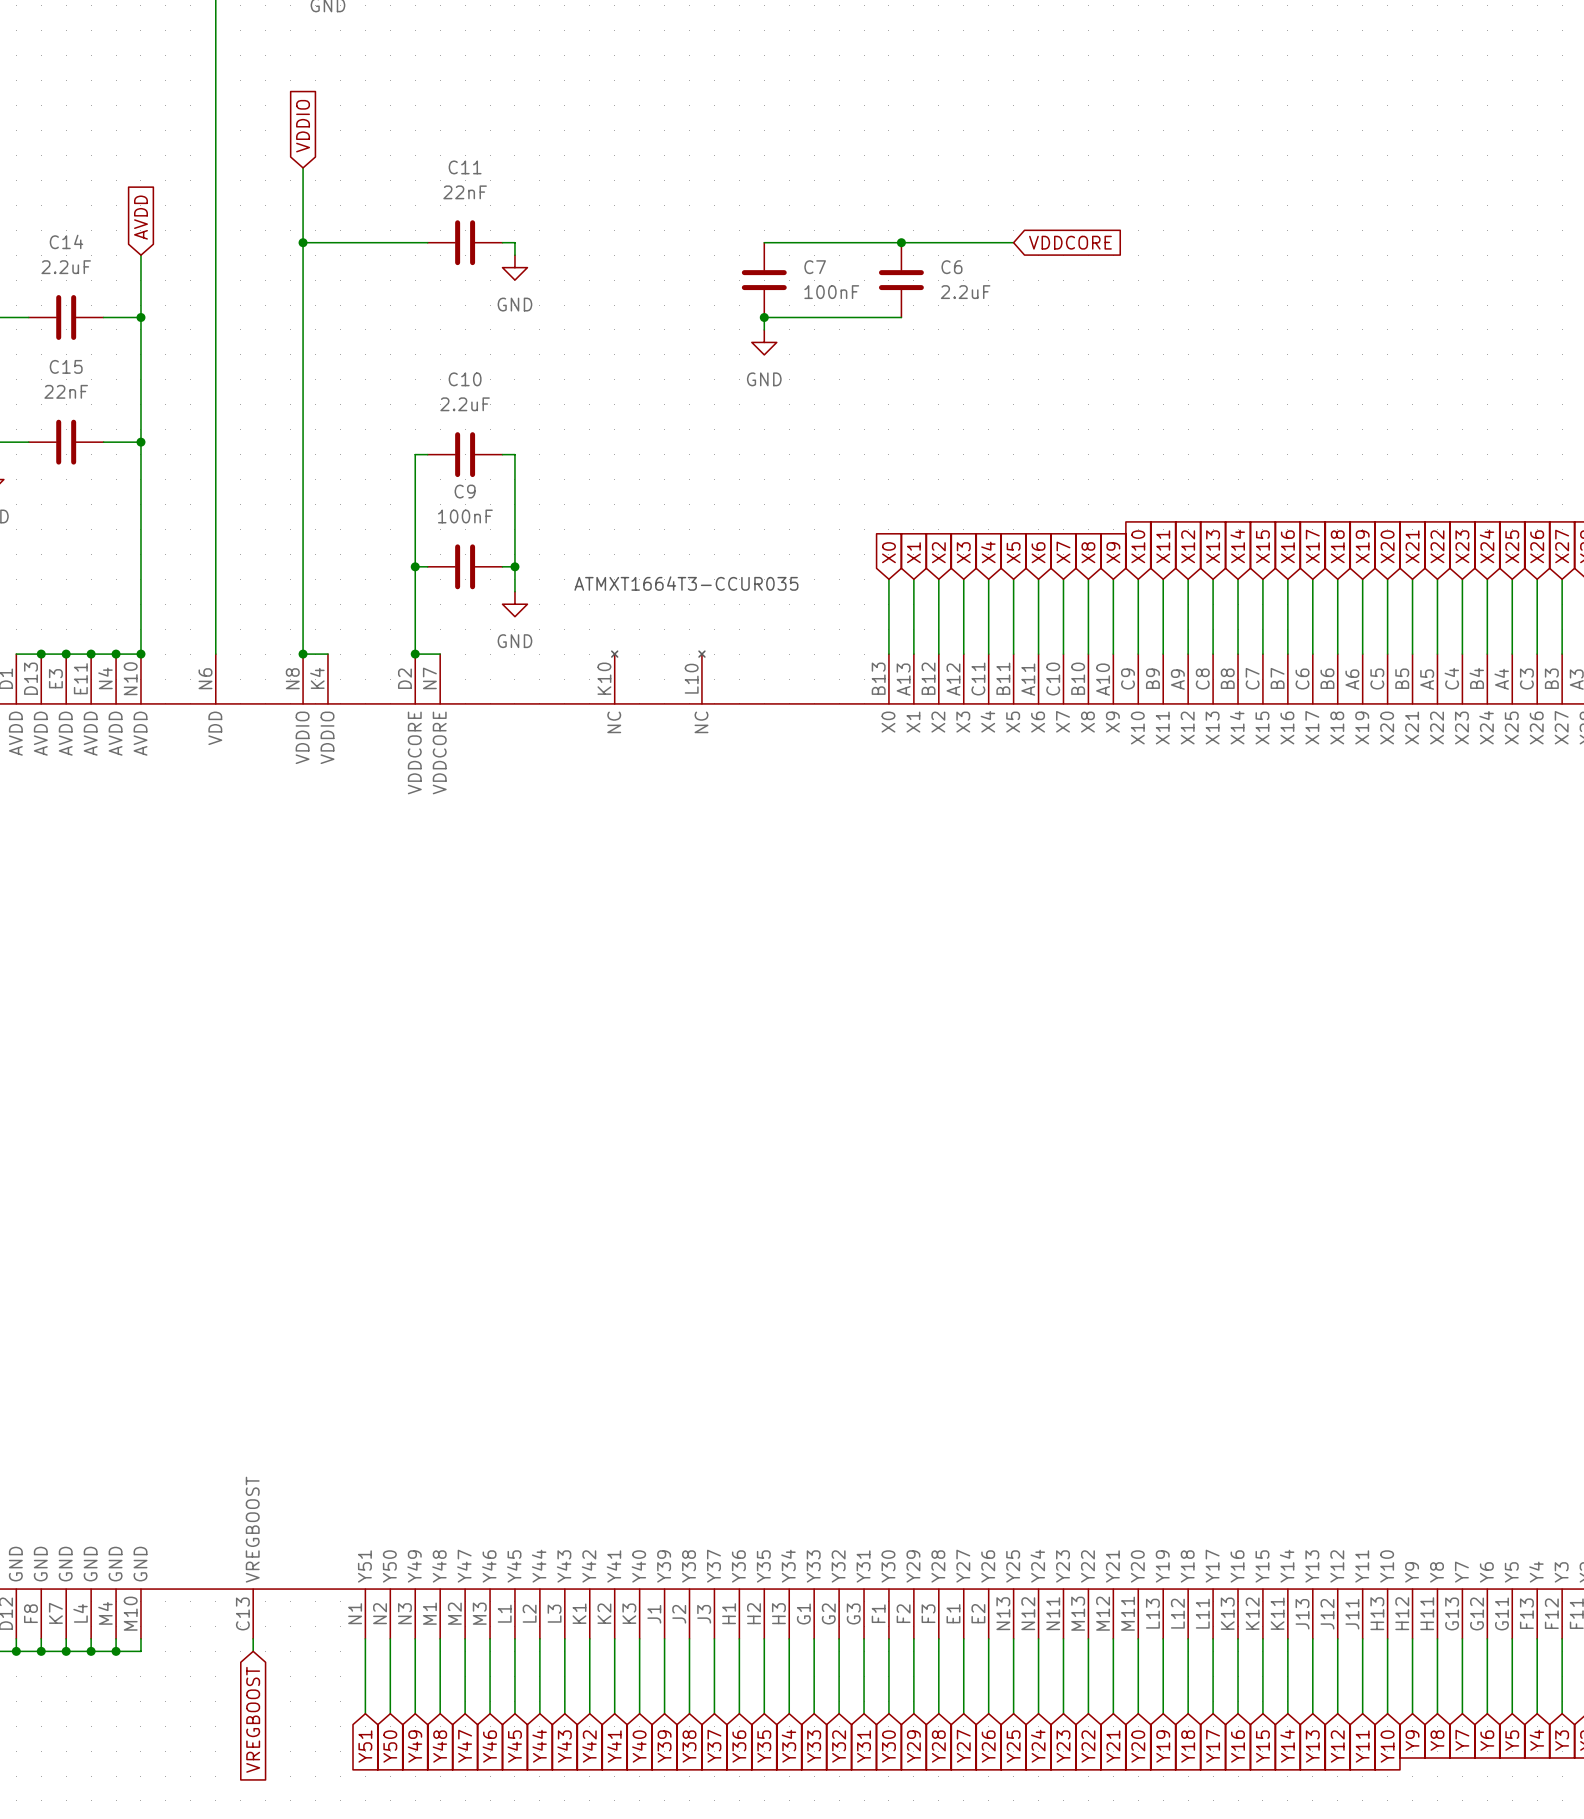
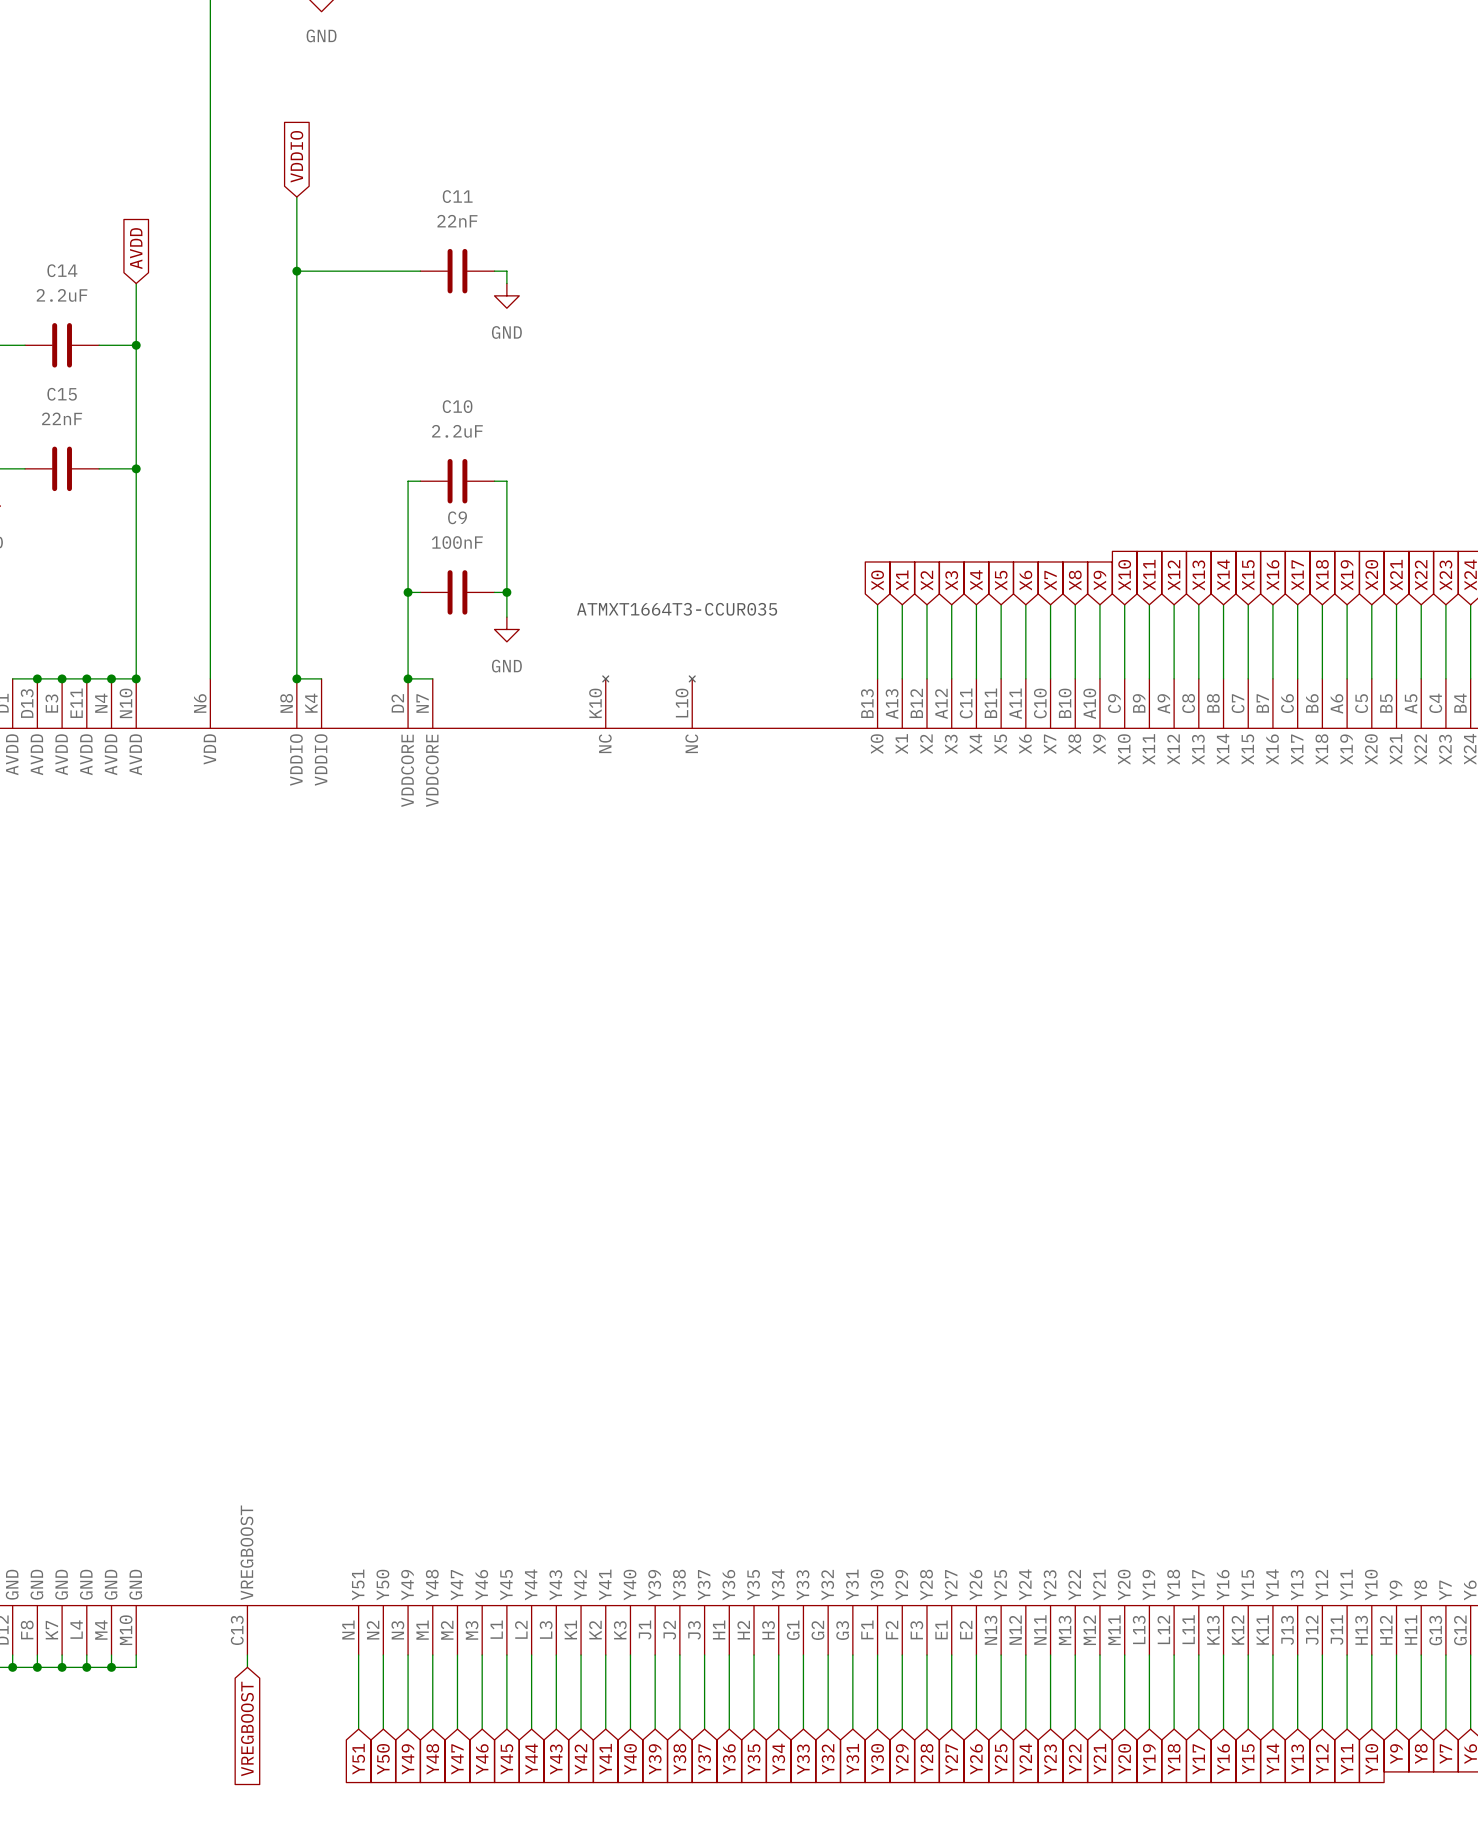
wire: (764, 242) (1013, 242) -> none
junction: (901, 242) -> none
global label: VDDCORE (1070, 242) -> none
C7: 100nF (764, 280) -> none
C6: 2.2uF (901, 280) -> none
junction: (764, 317) -> none
wire: (901, 317) (764, 317) (764, 329) -> none
power symbol: GND (764, 342) -> none

